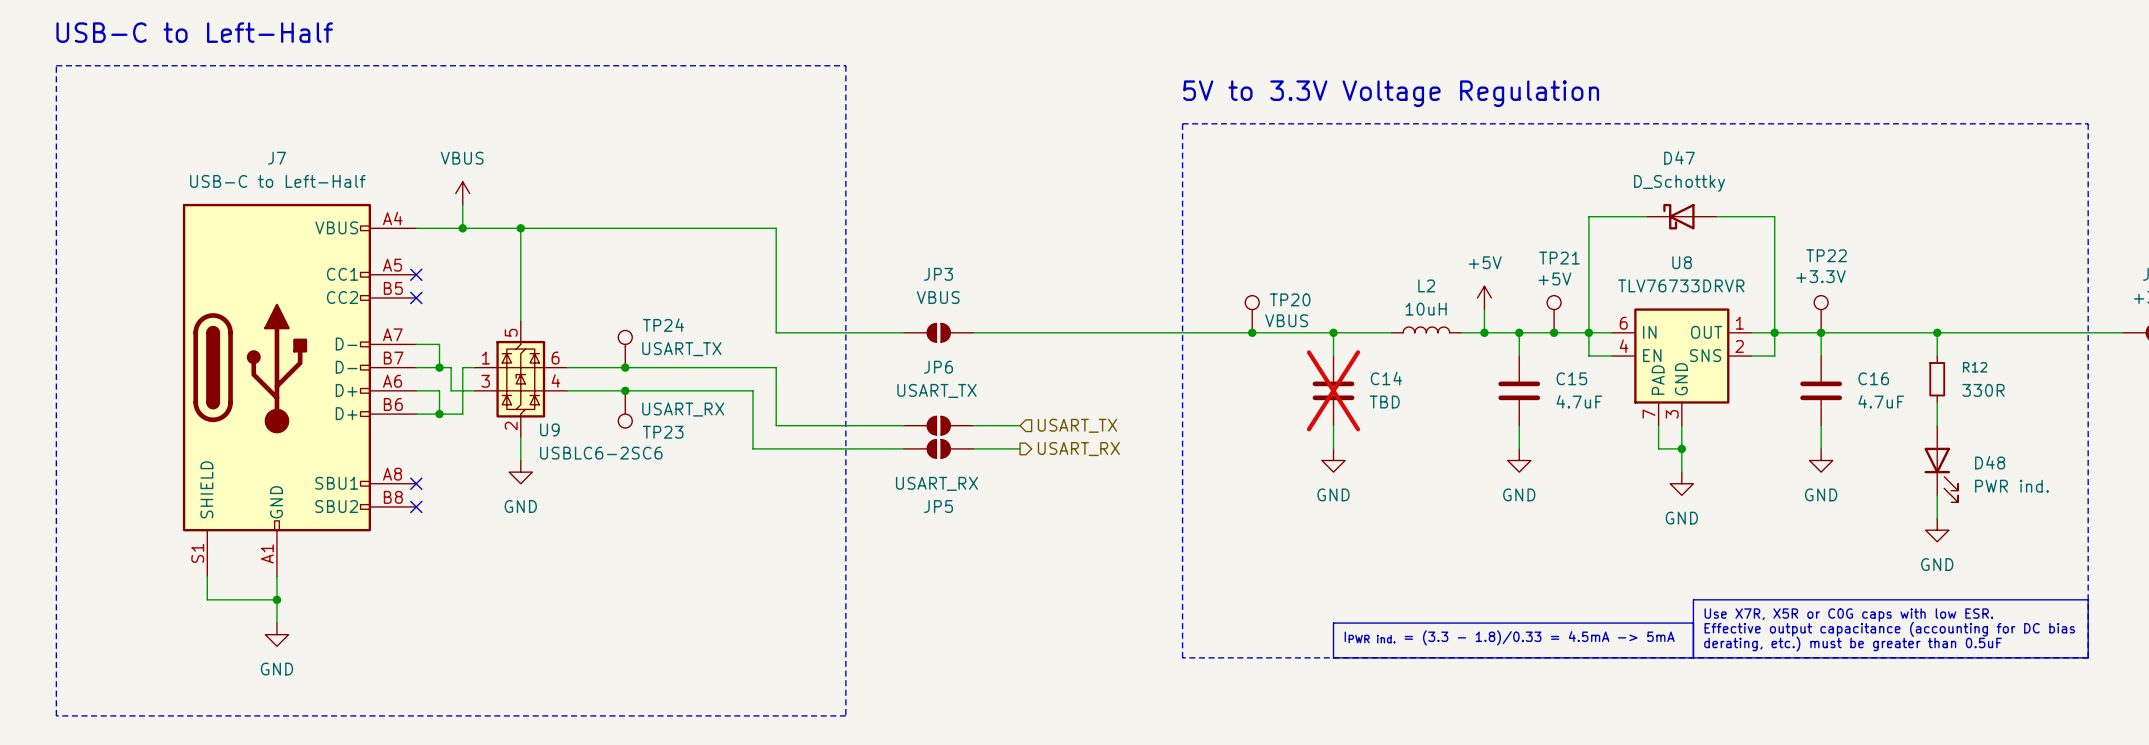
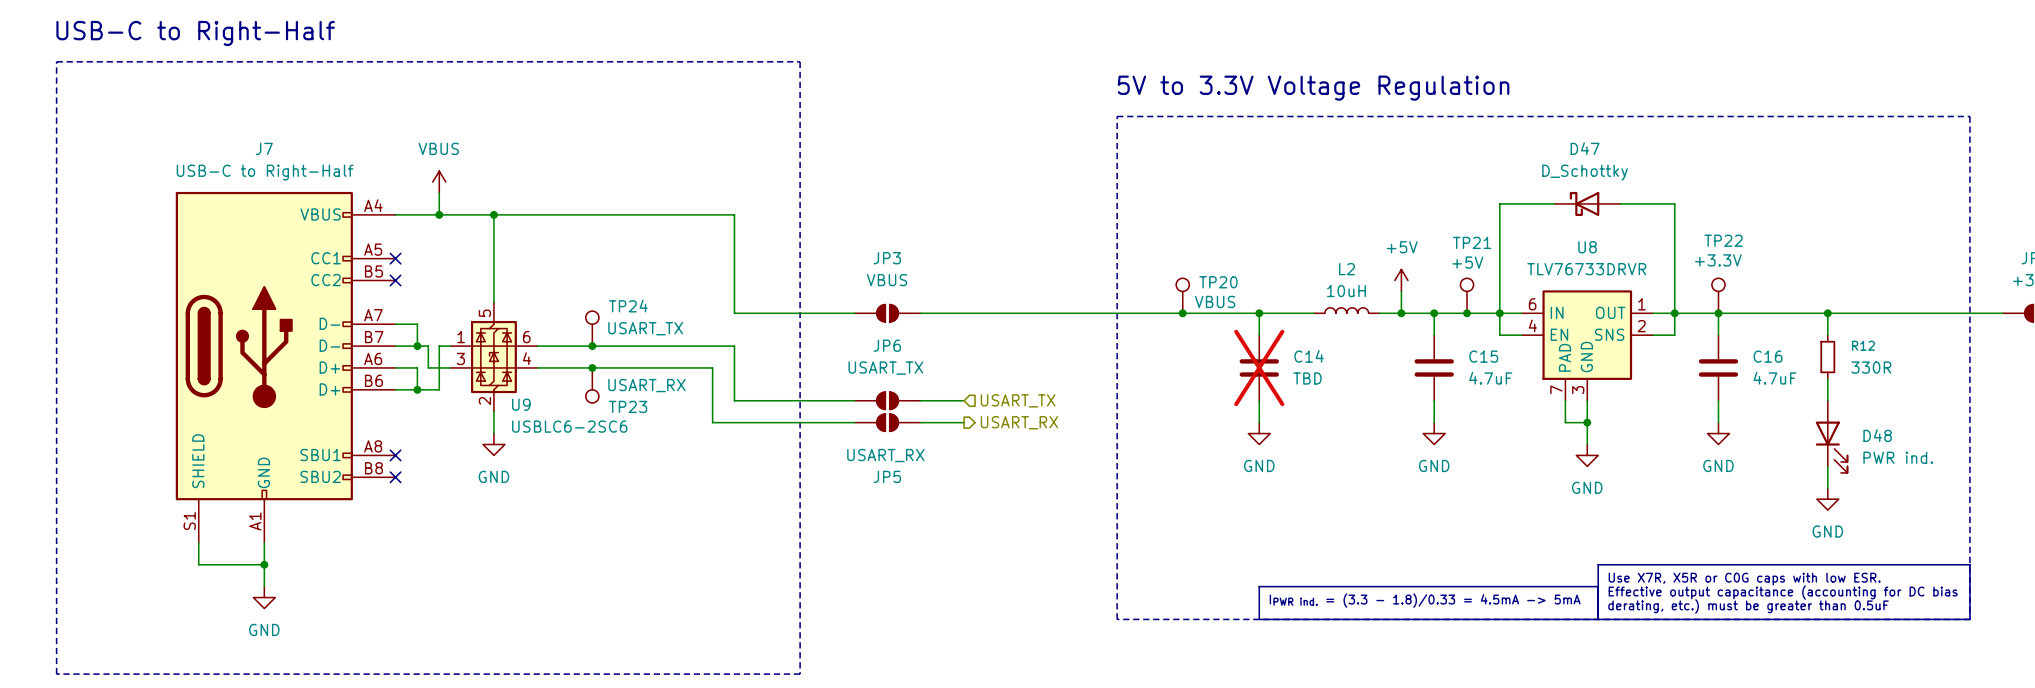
text: USB-C to Left-Half (194, 32) -> USB-C to Right-Half (195, 33)
J7 value: USB-C to Left-Half (277, 181) -> USB-C to Right-Half (265, 172)

